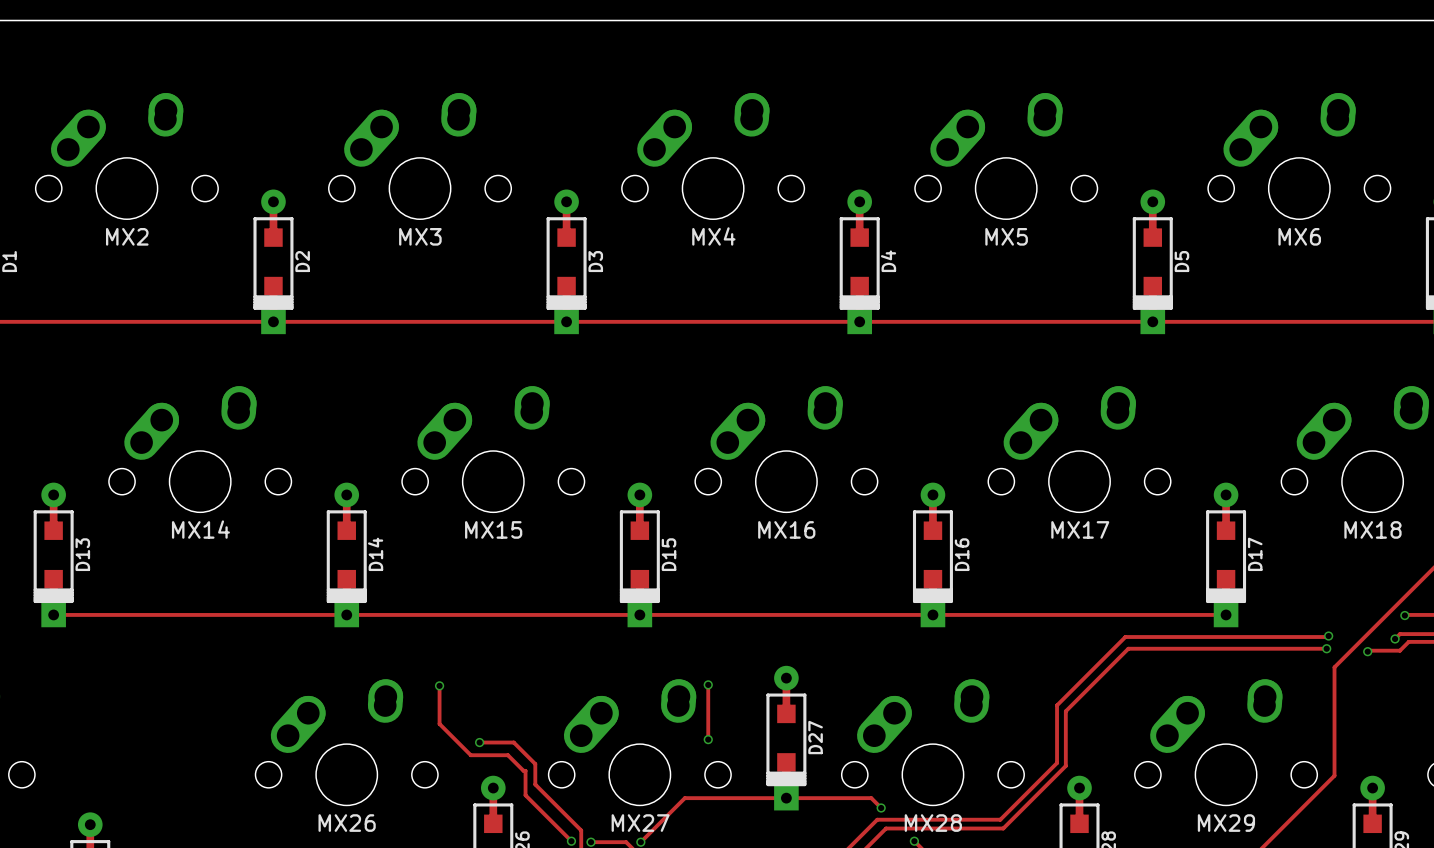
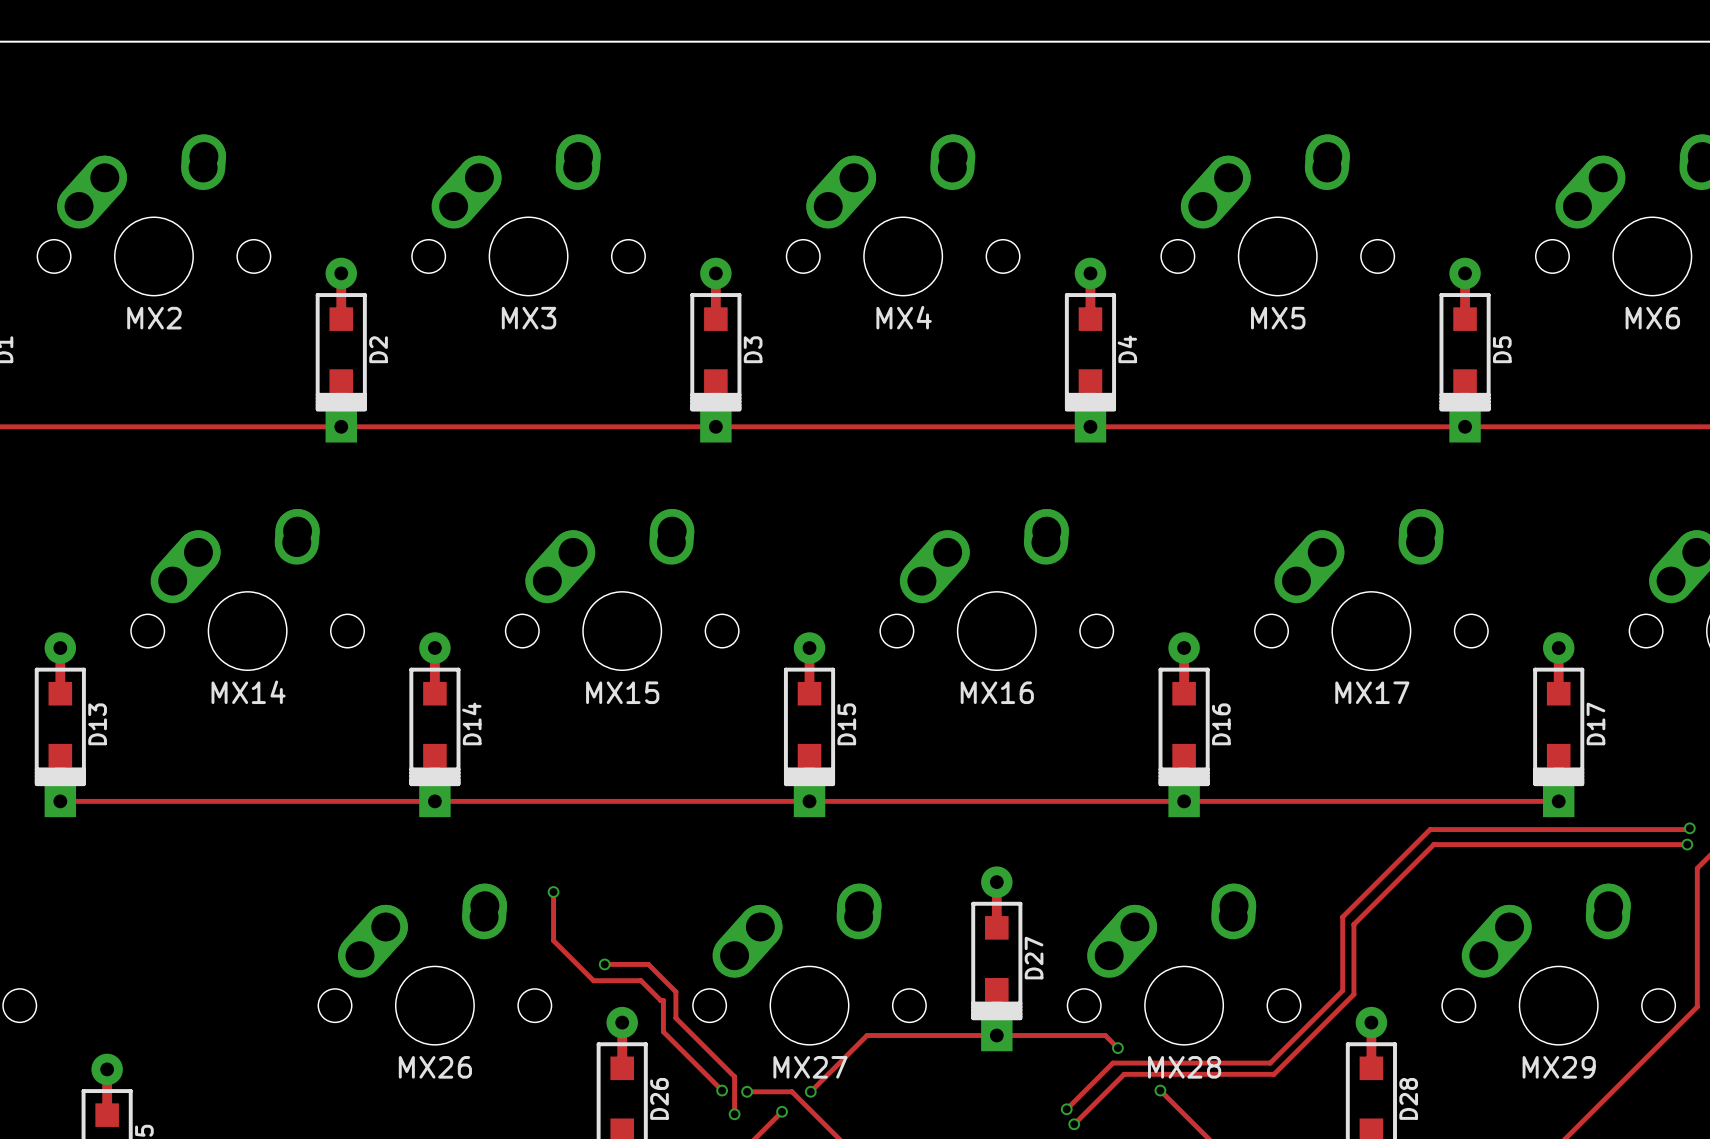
track: (708, 684) (708, 739) -> none
via: (708, 684) -> none
via: (708, 739) -> none

